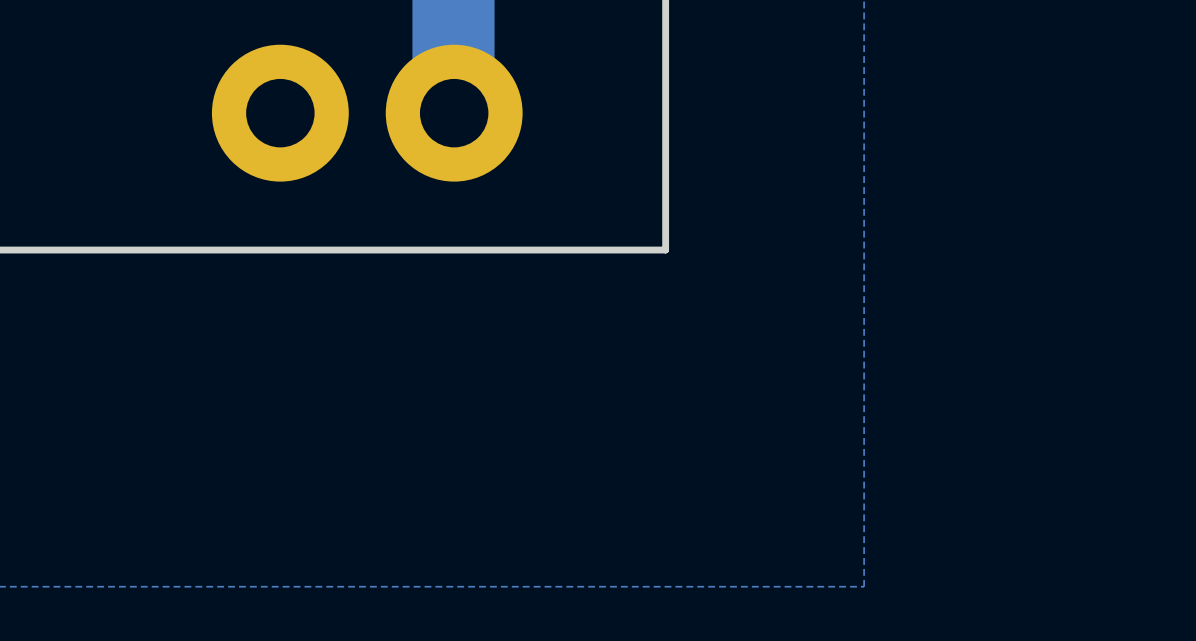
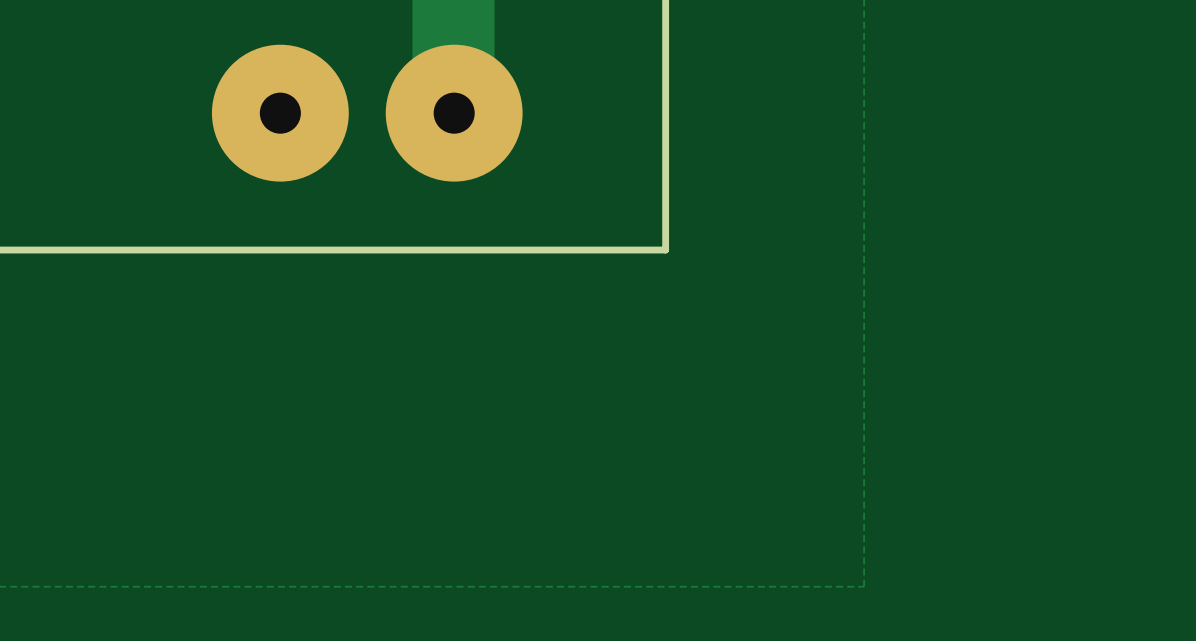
part footprint: [211, 44, 523, 182] -> [211, 44, 523, 182]

